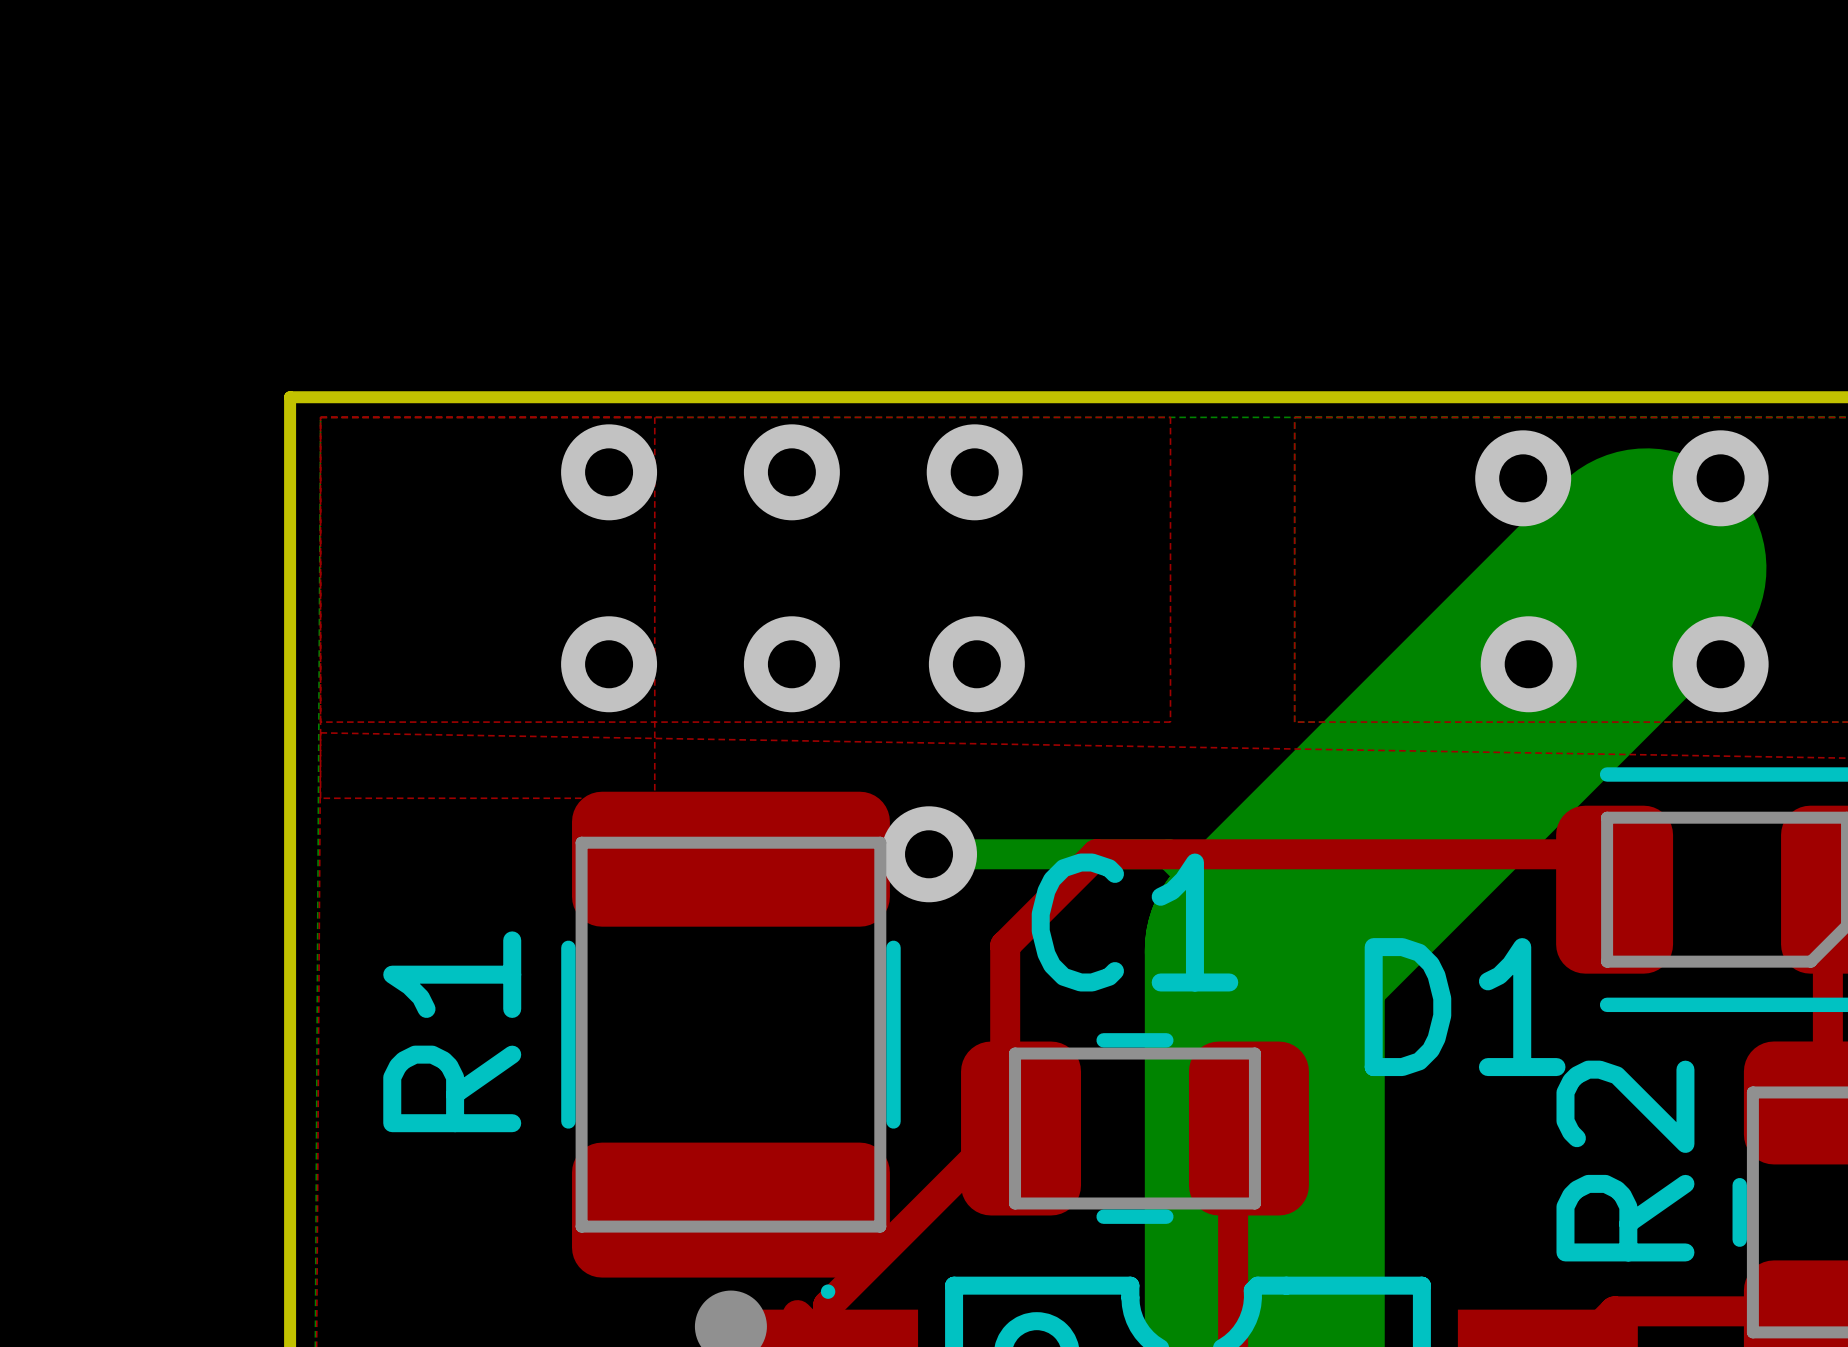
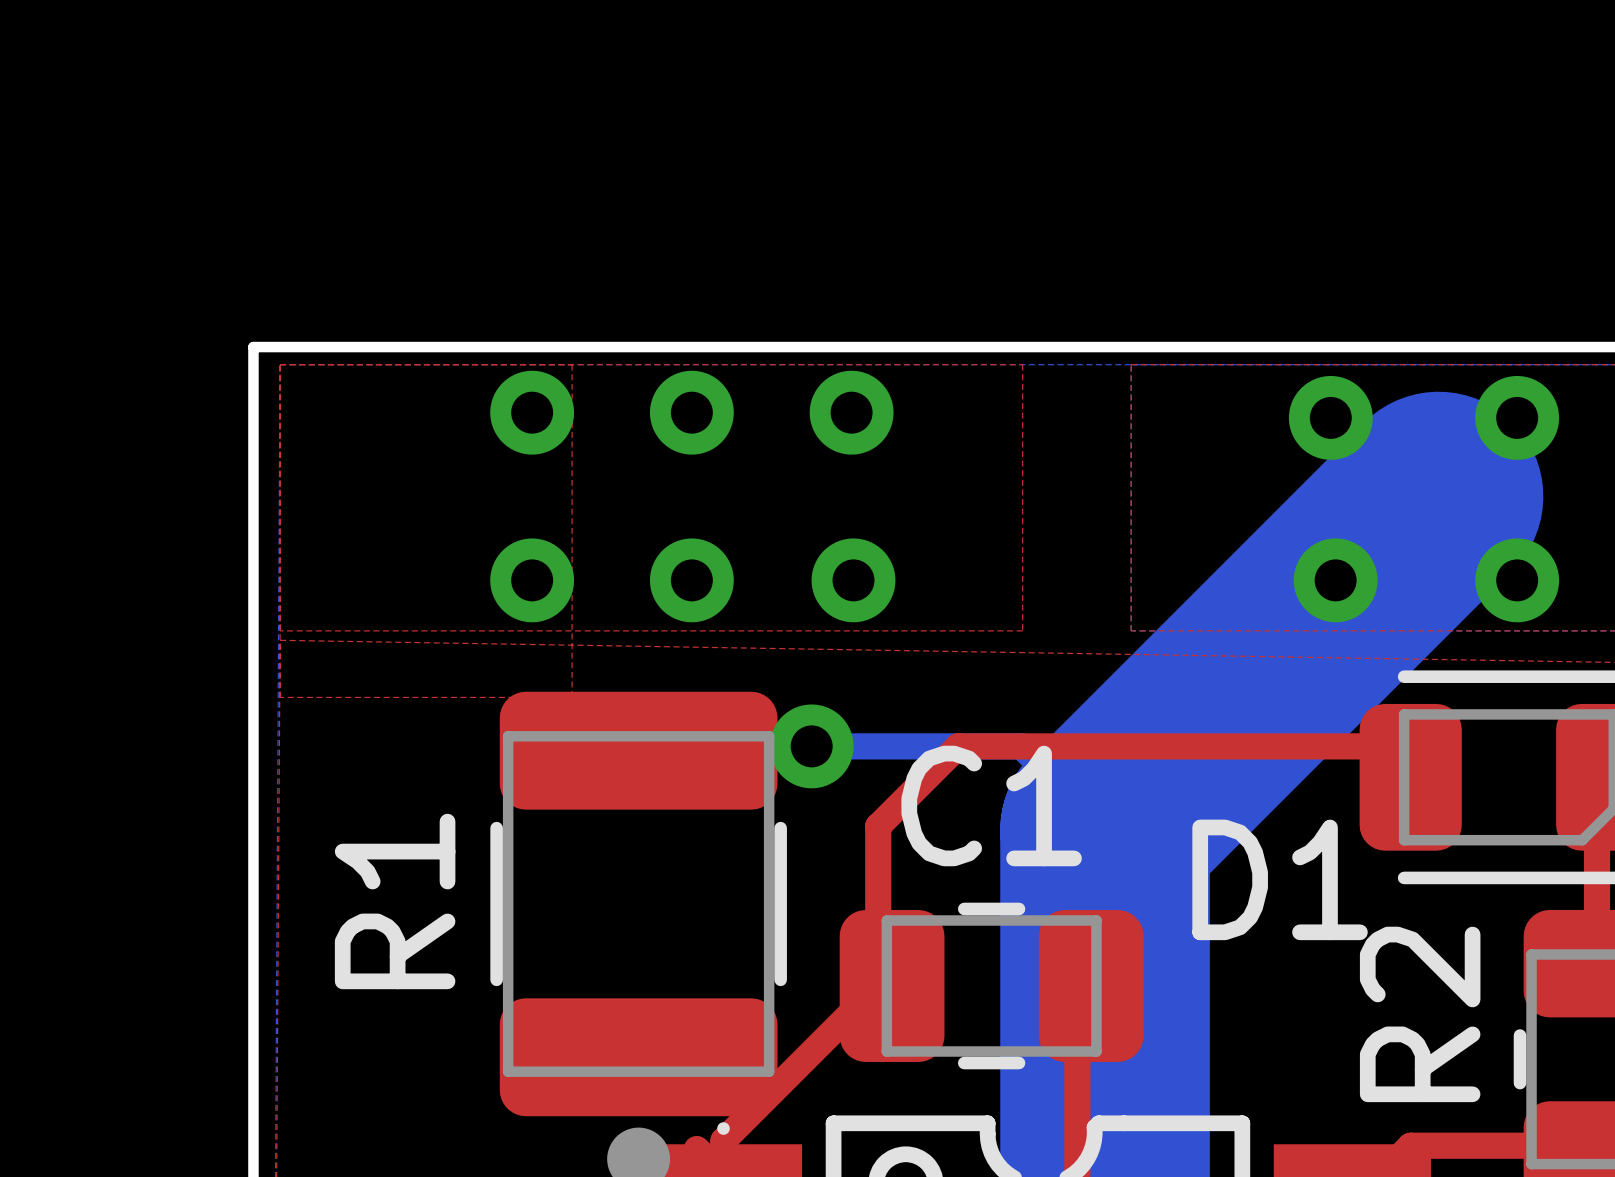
via position: (1720, 478) -> (1517, 417)
via position: (1720, 664) -> (1517, 580)

